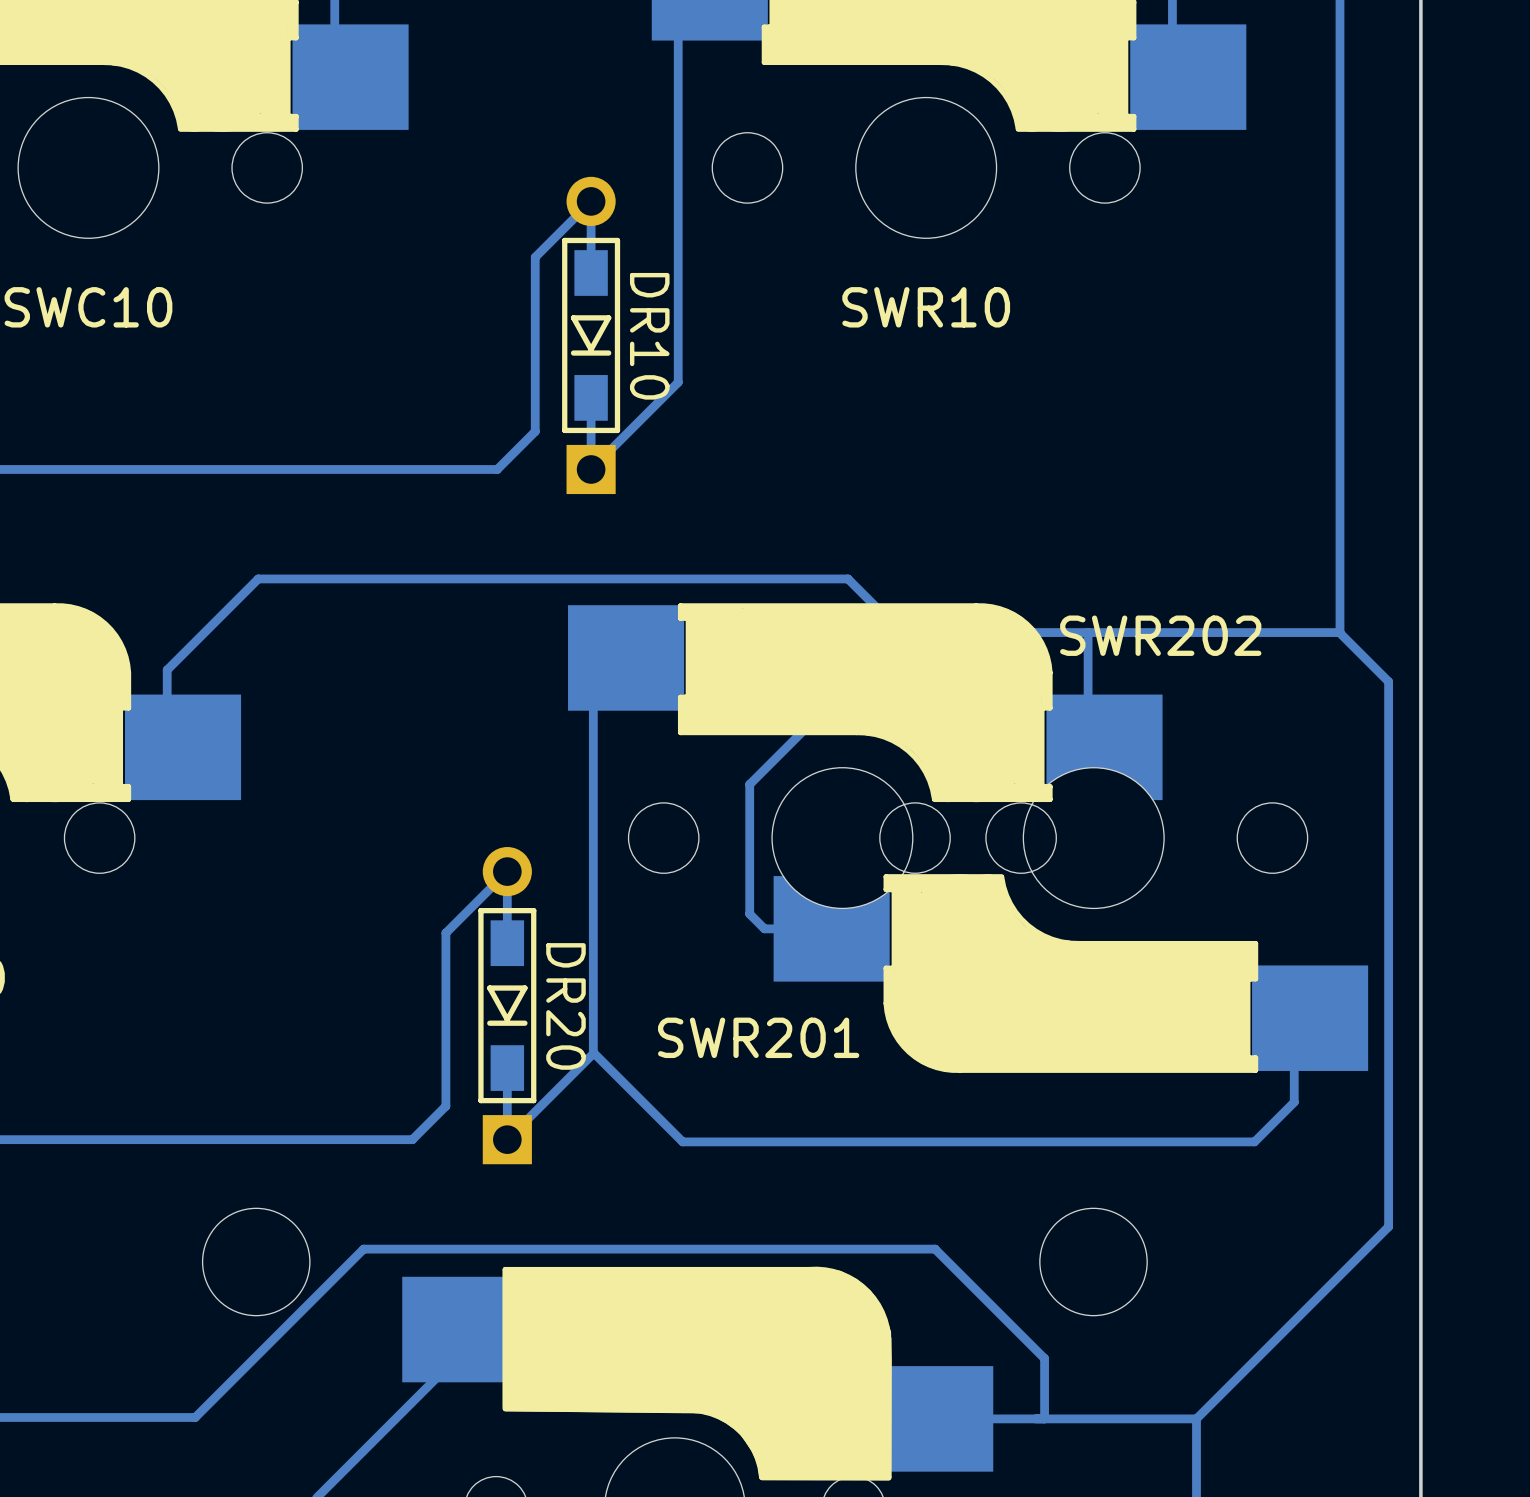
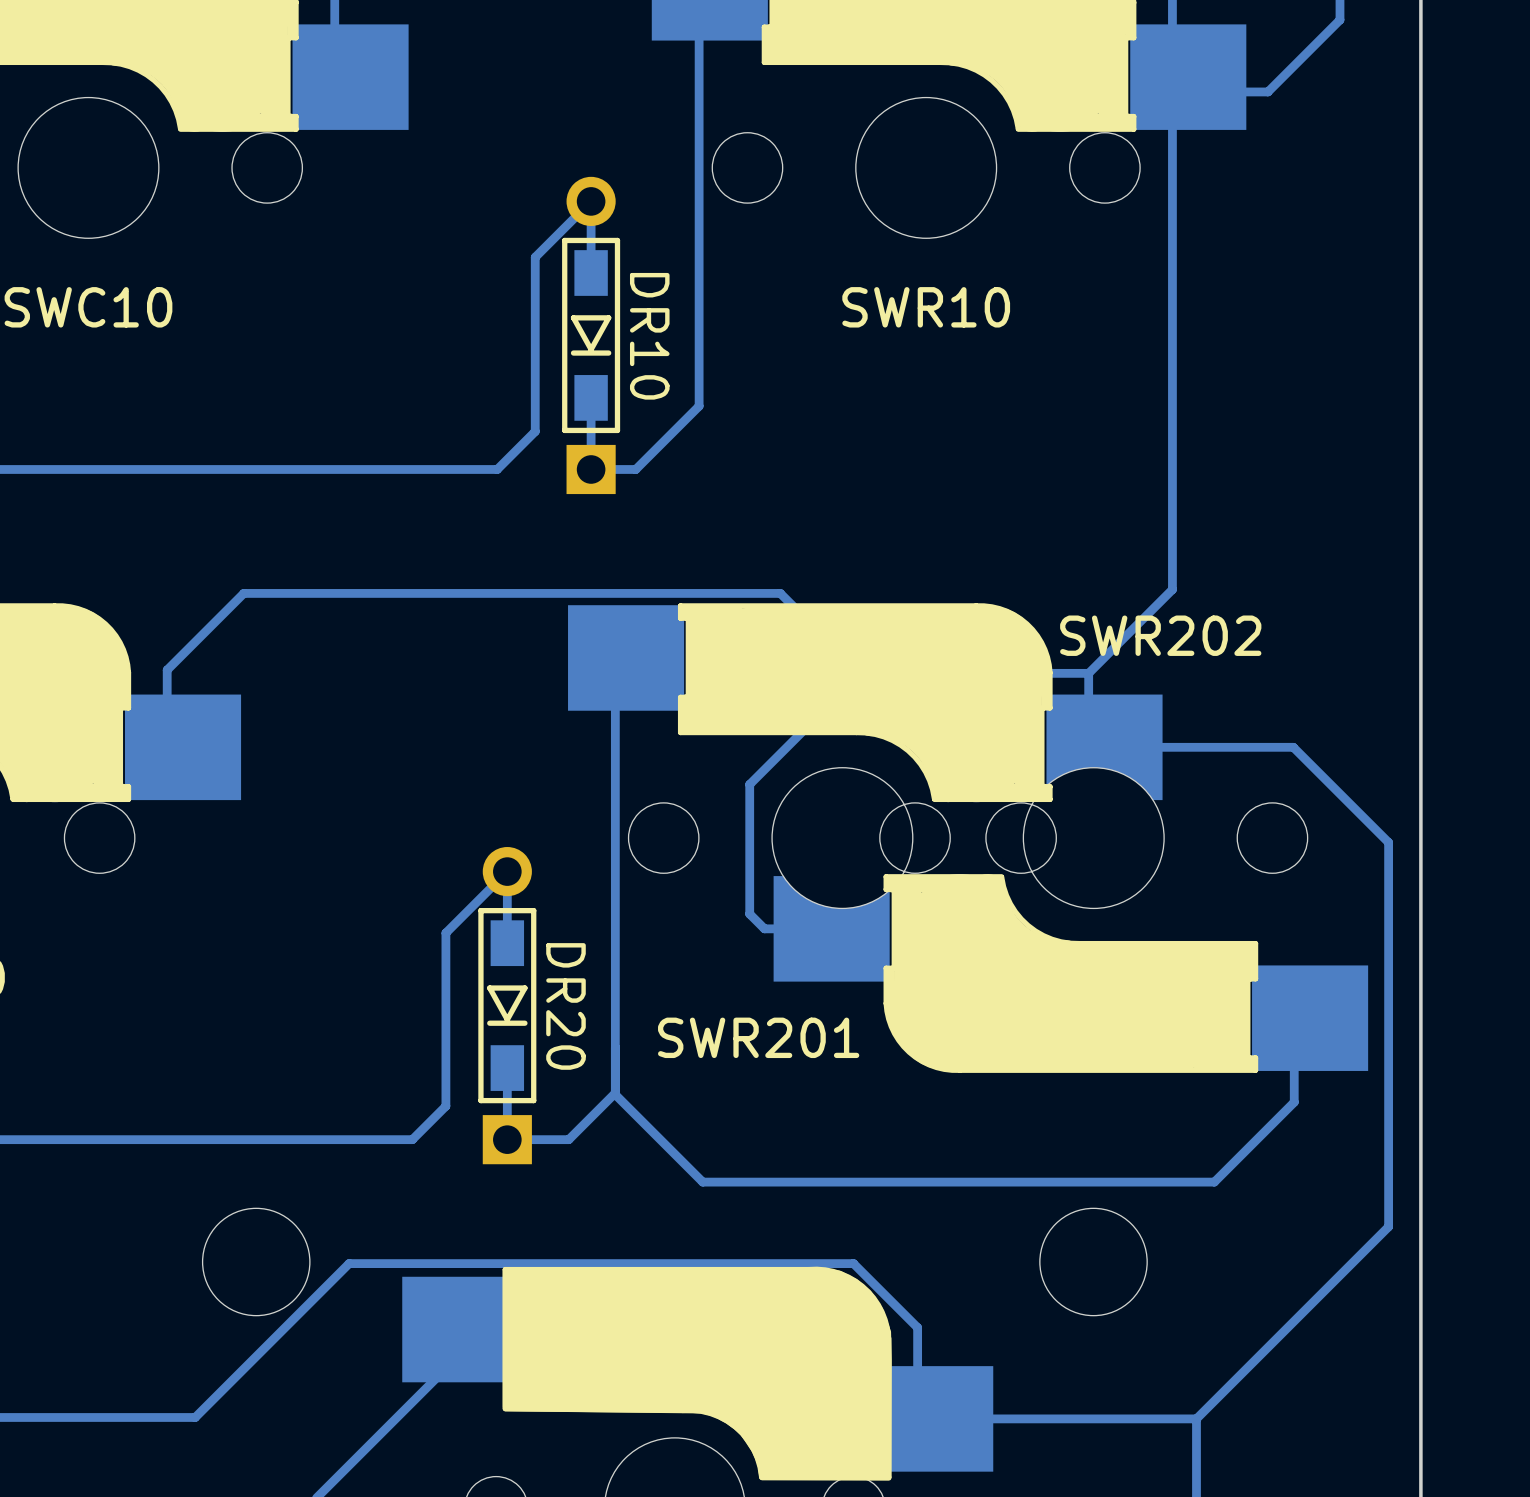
track: (699, 14) (678, 35) (678, 382) (591, 469) -> (699, 14) (699, 406) (635, 469) (591, 469)
track: (1339, 19) (1339, 632) -> (1339, 19) (1267, 91) (1187, 91)
track: none -> (1172, 77) (1172, 589) (1088, 673)
track: (243, 593) (258, 578) (848, 578) (901, 632) -> (243, 593) (780, 593) (860, 673) (1088, 673)
track: (1088, 632) (1088, 747) -> none
track: (1339, 632) (1388, 681) (1388, 842) -> (1088, 673) (1088, 747) (1293, 747) (1388, 842)
track: (1339, 632) (901, 632) -> none
track: (615, 684) (593, 706) (593, 1052) (682, 1141) (1254, 1141) -> (615, 684) (615, 1094) (702, 1182) (1214, 1182) (1254, 1141)
track: (593, 1053) (507, 1139) -> (615, 1093) (568, 1139) (507, 1139)
track: (349, 1263) (363, 1249) (935, 1249) (1044, 1358) (1044, 1418) -> (349, 1263) (853, 1263) (917, 1327) (917, 1418)

